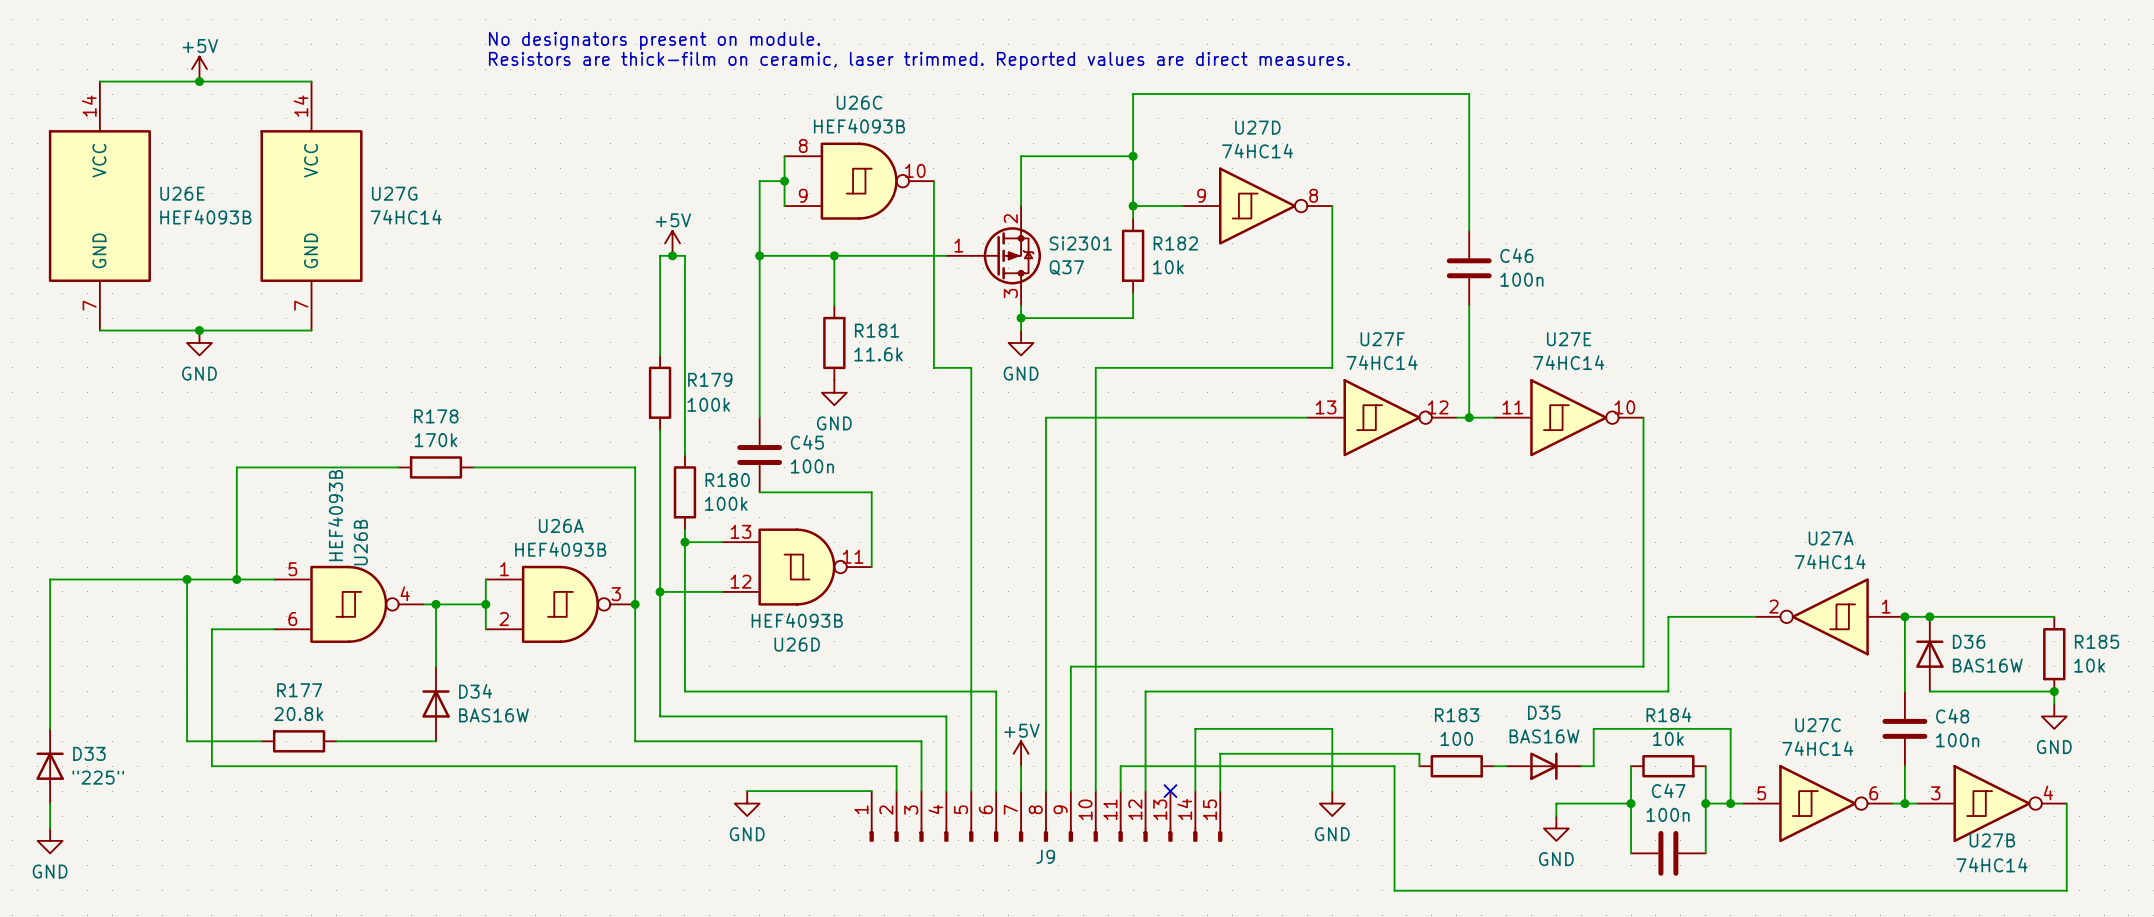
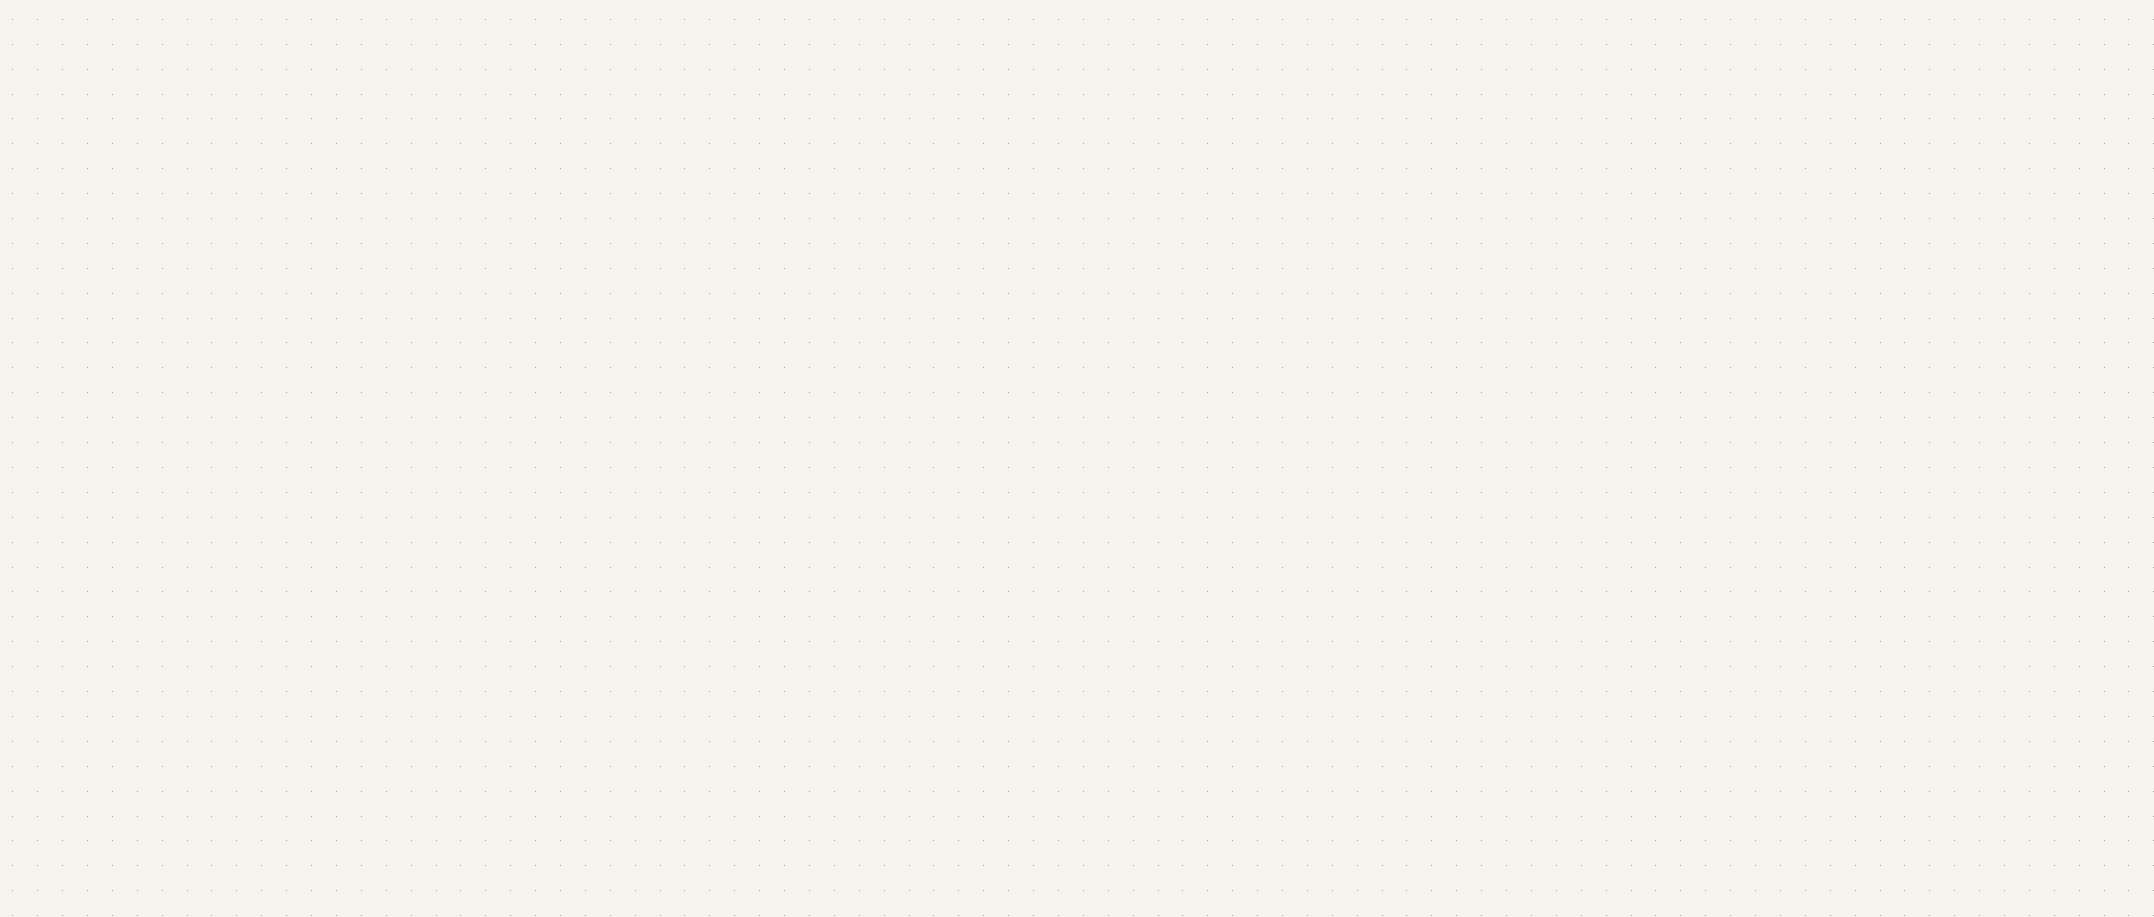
text: No designators present on module. (654, 40) -> none
text: Resistors are thick-film on ceramic, laser trimmed. Reported values are direct measures. (919, 60) -> none
power symbol: +5V (199, 69) -> none
wire: (99, 81) (311, 81) -> none
junction: (199, 81) -> none
wire: (784, 156) (784, 206) -> none
wire: (1133, 156) (1021, 156) (1021, 206) -> none
junction: (1133, 156) -> none
wire: (784, 181) (759, 181) (759, 417) -> none
junction: (784, 181) -> none
U26C: HEF4093B (859, 181) -> none
wire: (933, 181) (933, 367) (971, 367) (971, 791) -> none
U26E: HEF4093B (99, 206) -> none
U27G: 74HC14 (311, 206) -> none
wire: (1133, 206) (1182, 206) -> none
junction: (1133, 206) -> none
U27D: 74HC14 (1257, 206) -> none
wire: (1332, 206) (1332, 367) (1095, 367) (1095, 791) -> none
wire: (1133, 218) (1133, 94) (1469, 94) (1469, 230) -> none
power symbol: +5V (672, 243) -> none
junction: (672, 255) -> none
wire: (759, 255) (946, 255) -> none
junction: (759, 255) -> none
wire: (834, 255) (834, 305) -> none
junction: (834, 255) -> none
Q37: Si2301 (993, 255) -> none
R182: 10k (1133, 255) -> none
C46: 100n (1469, 268) -> none
wire: (1133, 293) (1133, 318) (1021, 318) -> none
wire: (1021, 305) (1021, 330) -> none
wire: (1469, 305) (1469, 417) -> none
junction: (1021, 318) -> none
wire: (99, 330) (311, 330) -> none
junction: (199, 330) -> none
power symbol: GND (199, 342) -> none
R181: 11.6k (834, 342) -> none
power symbol: GND (1021, 342) -> none
wire: (660, 355) (660, 255) (684, 255) (684, 455) -> none
R179: 100k (660, 392) -> none
power symbol: GND (834, 392) -> none
wire: (1307, 417) (1045, 417) (1045, 791) -> none
U27F: 74HC14 (1382, 417) -> none
wire: (1456, 417) (1494, 417) -> none
junction: (1469, 417) -> none
U27E: 74HC14 (1568, 417) -> none
wire: (1643, 417) (1643, 666) (1070, 666) (1070, 791) -> none
wire: (660, 430) (660, 716) (946, 716) (946, 791) -> none
C45: 100n (759, 455) -> none
wire: (398, 467) (236, 467) (236, 579) -> none
R178: 170k (436, 467) -> none
wire: (473, 467) (635, 467) (635, 741) (921, 741) (921, 791) -> none
R180: 100k (684, 492) -> none
wire: (759, 492) (871, 492) (871, 567) -> none
wire: (684, 529) (684, 691) (996, 691) (996, 791) -> none
wire: (684, 542) (722, 542) -> none
junction: (684, 542) -> none
U26D: HEF4093B (797, 567) -> none
wire: (187, 579) (187, 741) (261, 741) -> none
junction: (187, 579) -> none
junction: (236, 579) -> none
wire: (274, 579) (50, 579) (50, 728) -> none
wire: (485, 579) (485, 629) -> none
wire: (660, 591) (722, 591) -> none
junction: (660, 591) -> none
U26B: HEF4093B (348, 604) -> none
wire: (423, 604) (485, 604) -> none
wire: (436, 604) (436, 666) -> none
junction: (436, 604) -> none
junction: (485, 604) -> none
U26A: HEF4093B (560, 604) -> none
junction: (635, 604) -> none
wire: (1755, 616) (1668, 616) (1668, 691) (1145, 691) (1145, 791) -> none
U27A: 74HC14 (1830, 616) -> none
junction: (1904, 616) -> none
junction: (1929, 616) -> none
wire: (2054, 616) (1904, 616) (1904, 691) -> none
wire: (274, 629) (211, 629) (211, 766) (896, 766) (896, 791) -> none
D36: BAS16W (1929, 654) -> none
R185: 10k (2054, 654) -> none
wire: (1929, 691) (2054, 691) (2054, 703) -> none
junction: (2054, 691) -> none
D34: BAS16W (436, 703) -> none
power symbol: GND (2054, 716) -> none
C48: 100n (1904, 728) -> none
R177: 20.8k (299, 741) -> none
wire: (336, 741) (436, 741) -> none
power symbol: +5V (1021, 753) -> none
D33: "225" (50, 766) -> none
wire: (1021, 766) (1021, 791) -> none
wire: (1419, 766) (1419, 753) (1220, 753) (1220, 791) -> none
R183: 100 (1456, 766) -> none
wire: (1494, 766) (1506, 766) -> none
D35: BAS16W (1543, 766) -> none
wire: (1581, 766) (1593, 766) (1593, 728) (1730, 728) (1730, 803) -> none
wire: (1631, 766) (1631, 853) -> none
R184: 10k (1668, 766) -> none
wire: (1705, 766) (1705, 853) -> none
wire: (1904, 766) (1904, 803) -> none
wire: (747, 791) (871, 791) -> none
wire: (1120, 791) (1120, 766) (1394, 766) (1394, 890) (2066, 890) (2066, 803) -> none
no-connect mark: (1170, 791) -> none
wire: (1195, 791) (1195, 728) (1332, 728) (1332, 791) -> none
wire: (50, 803) (50, 828) -> none
power symbol: GND (747, 803) -> none
power symbol: GND (1332, 803) -> none
wire: (1631, 803) (1556, 803) (1556, 816) -> none
junction: (1631, 803) -> none
wire: (1705, 803) (1743, 803) -> none
junction: (1705, 803) -> none
junction: (1730, 803) -> none
U27C: 74HC14 (1817, 803) -> none
wire: (1892, 803) (1917, 803) -> none
junction: (1904, 803) -> none
U27B: 74HC14 (1992, 803) -> none
J9: (1045, 816) -> none
power symbol: GND (1556, 828) -> none
power symbol: GND (50, 840) -> none
C47: 100n (1668, 853) -> none

